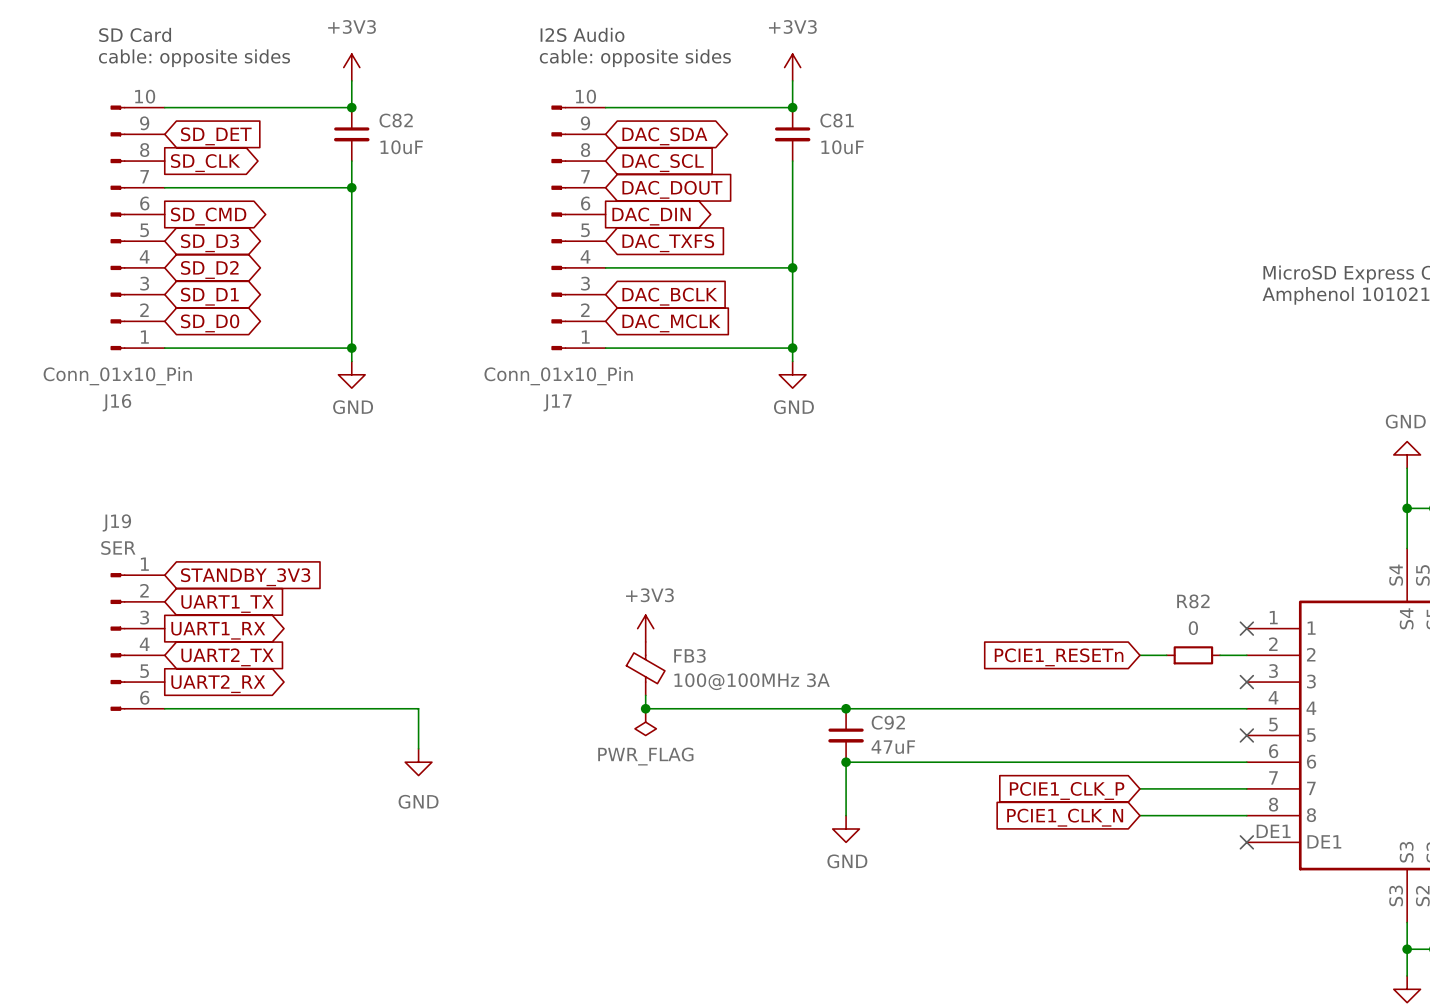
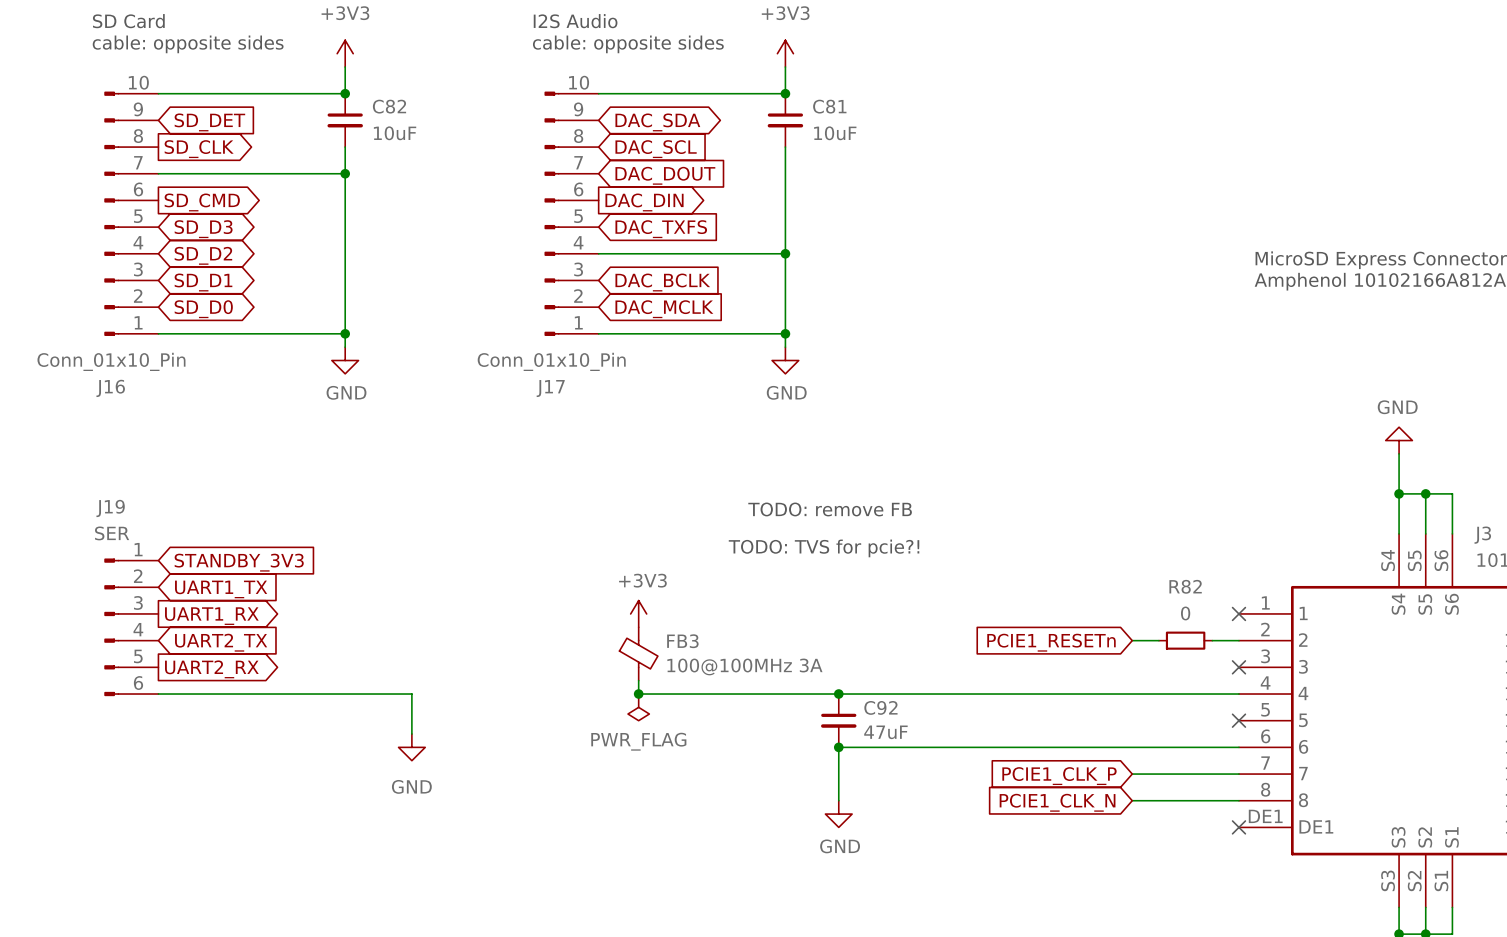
text: none -> TODO: remove FB (830, 509)
text: none -> TODO: TVS for pcie?! (824, 548)

